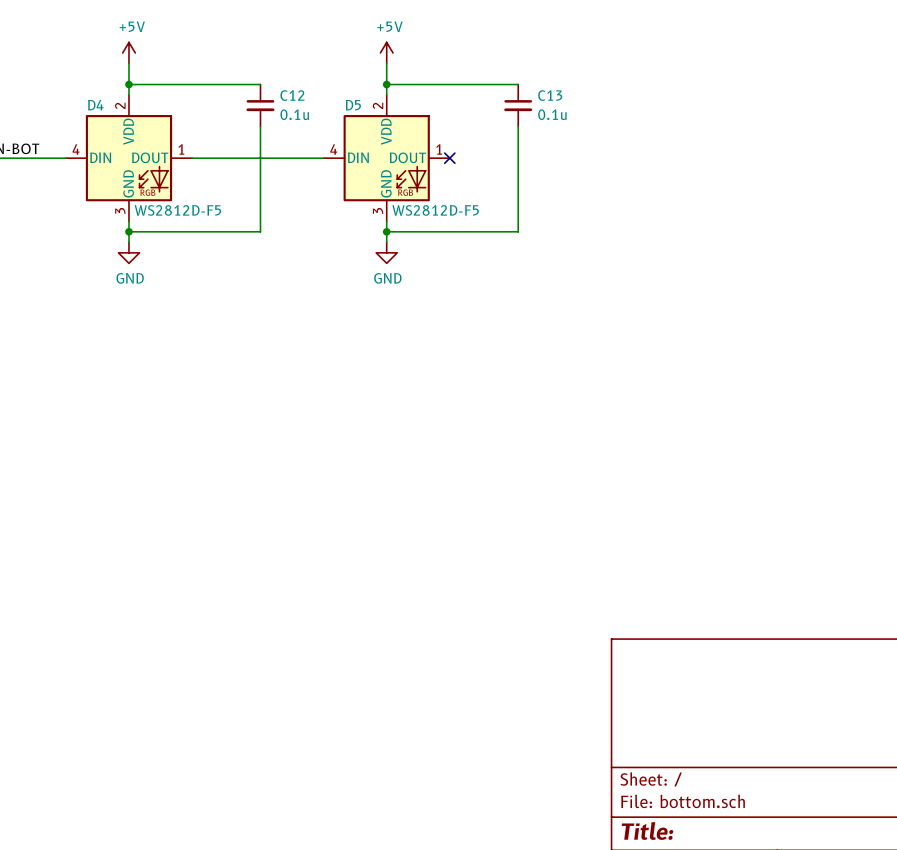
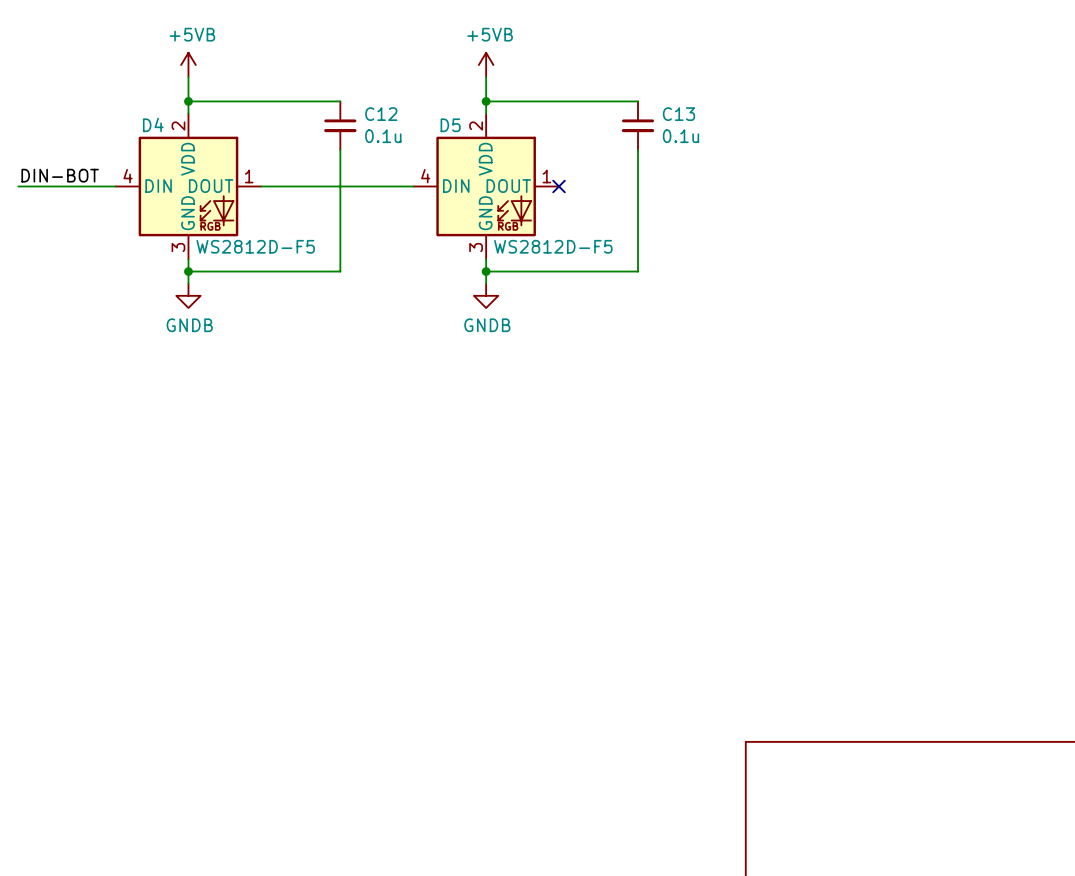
power symbol: +5V (128, 52) -> +5VB (188, 64)
power symbol: +5V (386, 52) -> +5VB (486, 64)
power symbol: GND (128, 252) -> GNDB (188, 295)
power symbol: GND (386, 252) -> GNDB (486, 295)

